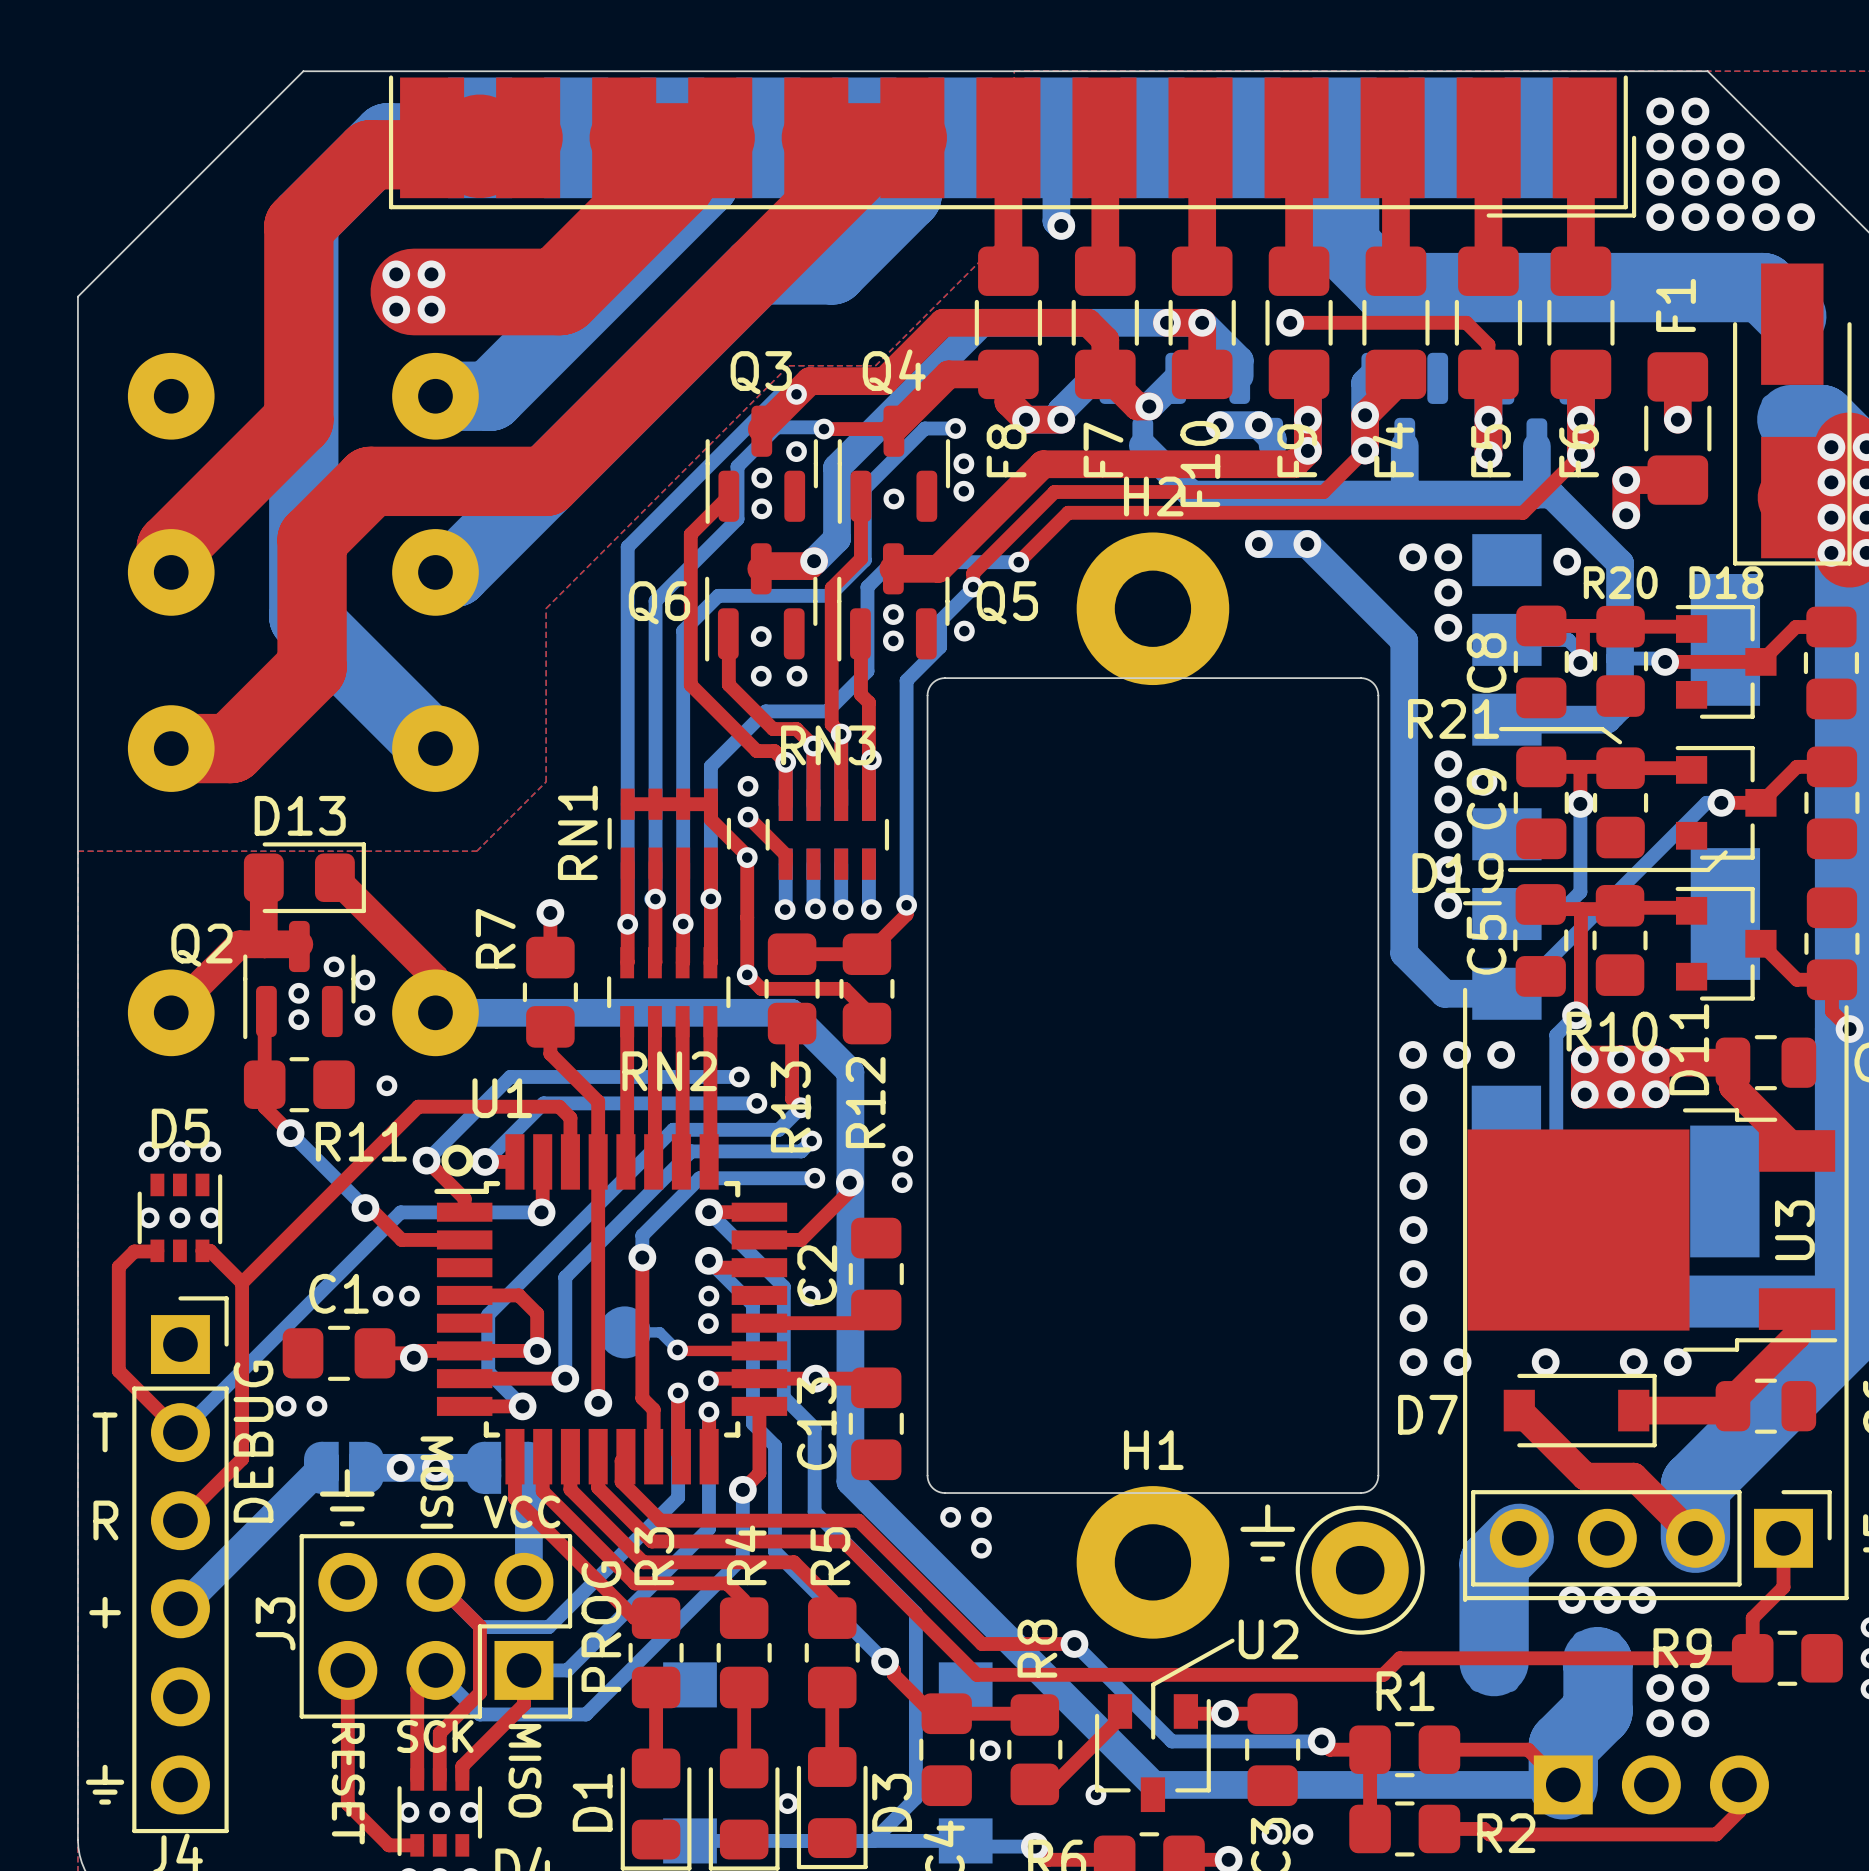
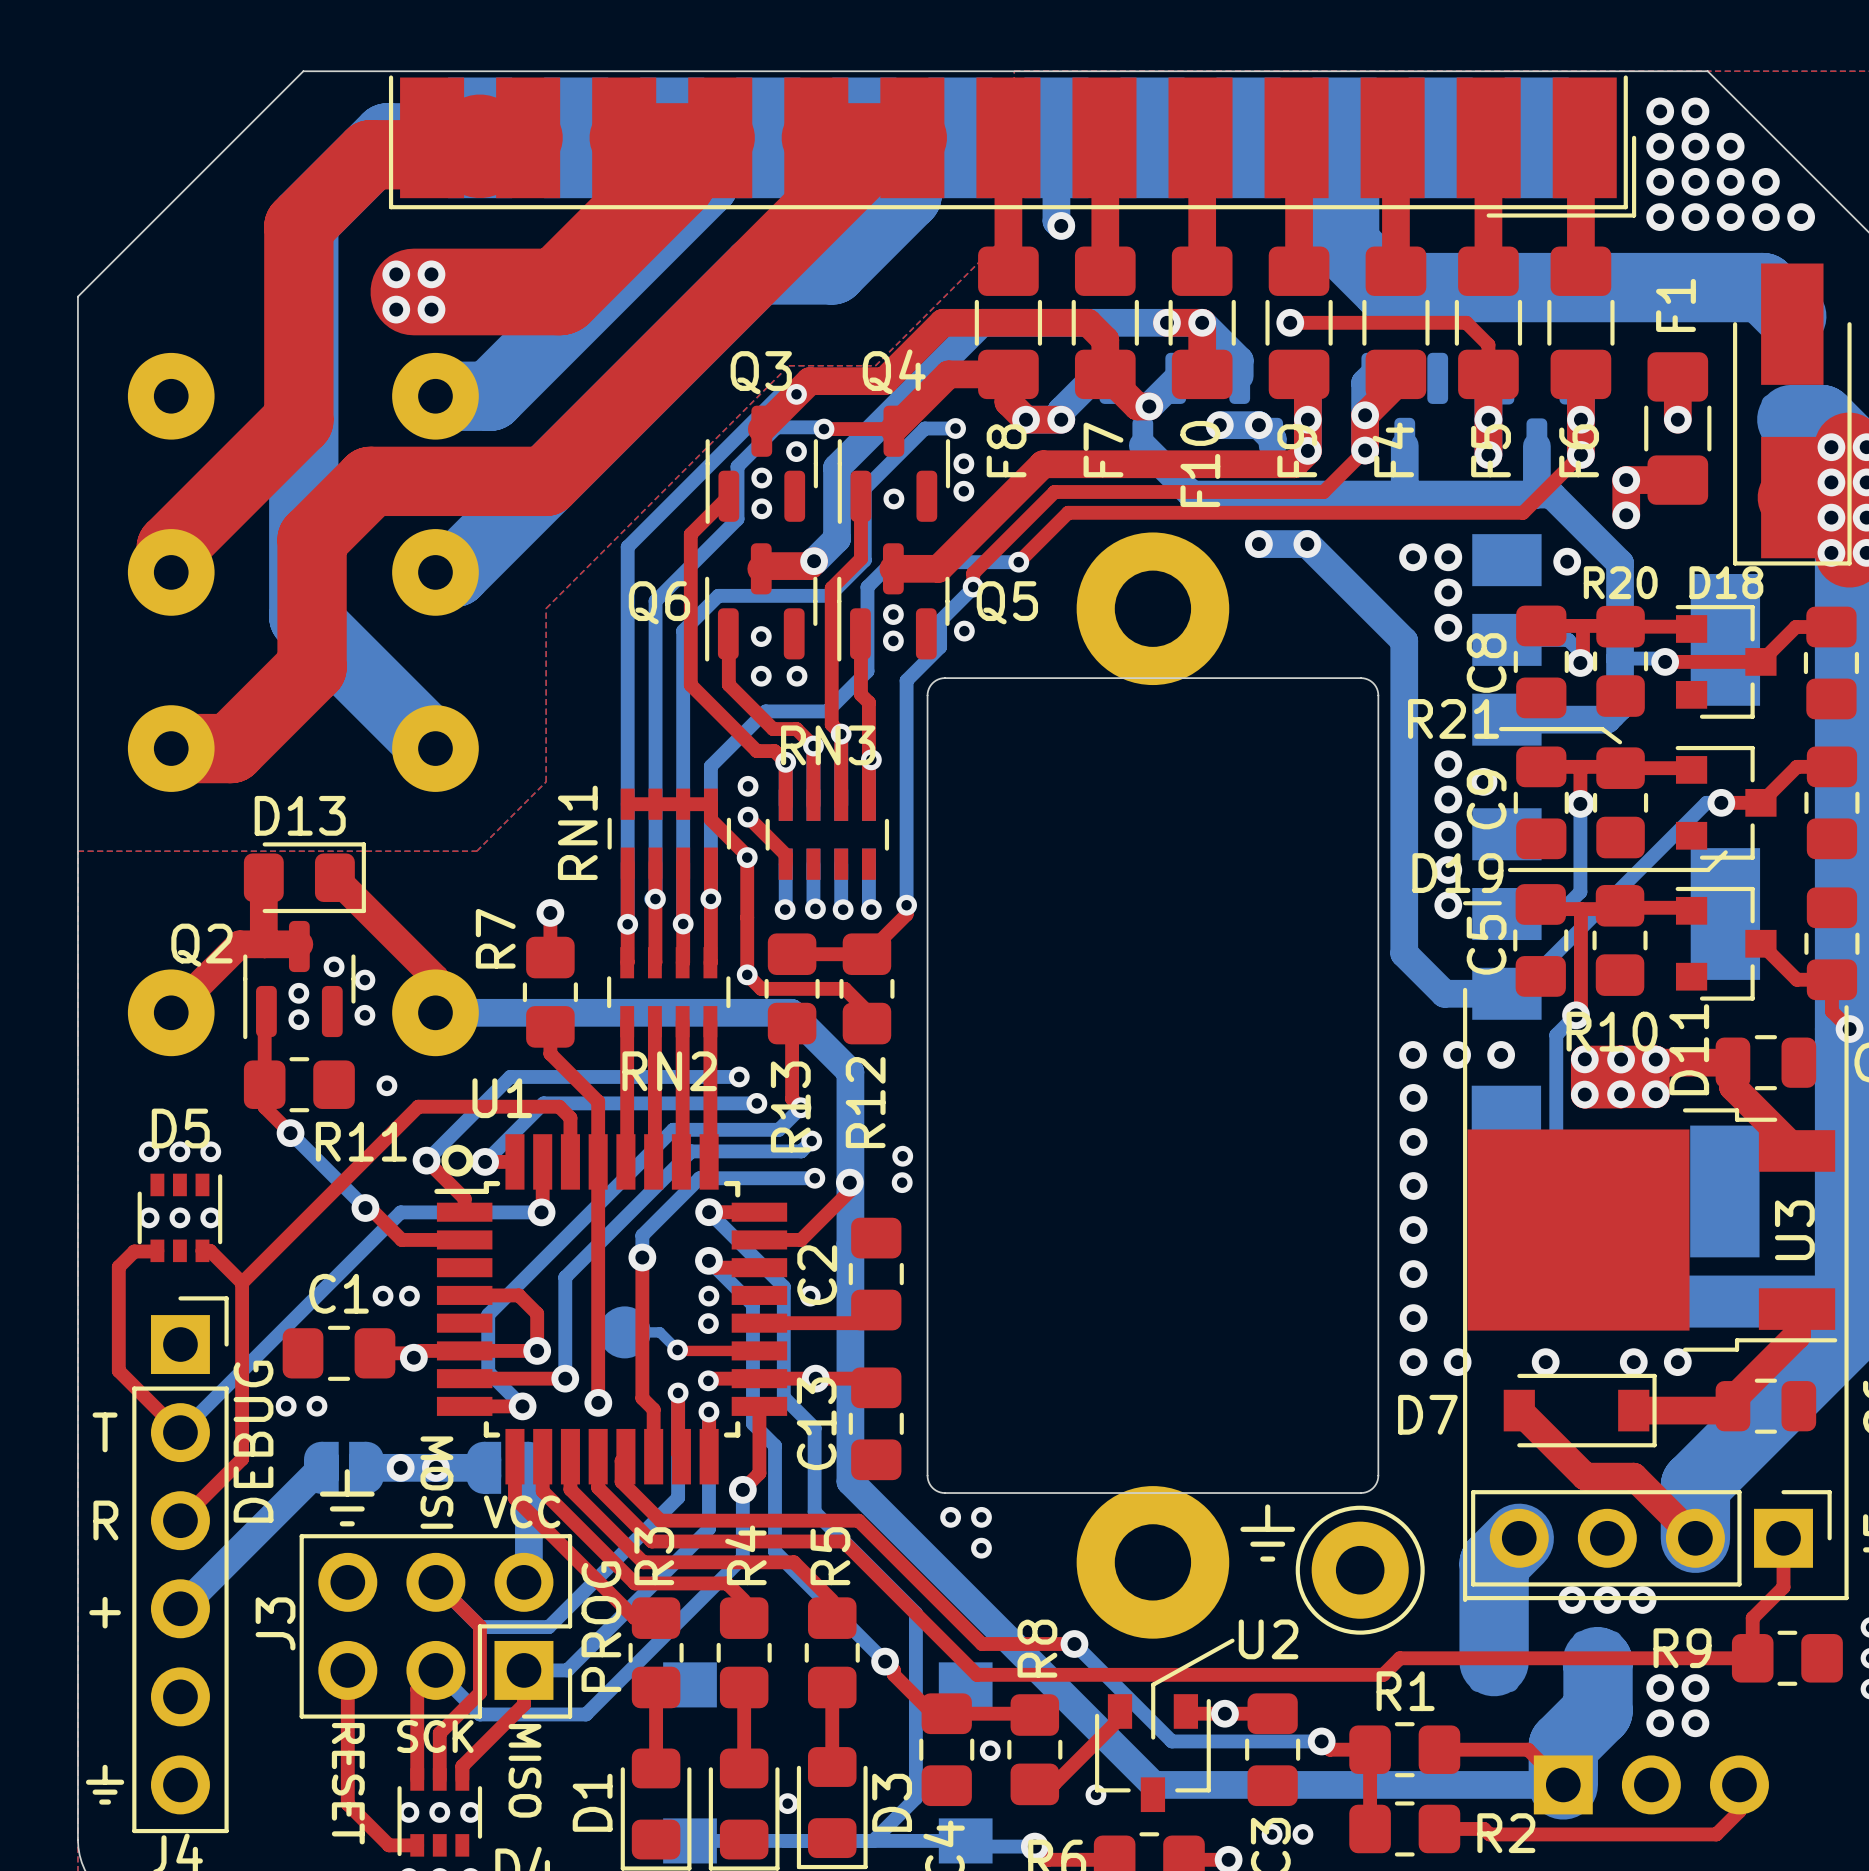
H2 name: H2 (1153, 496) -> none
H1 name: H1 (1153, 1450) -> none

